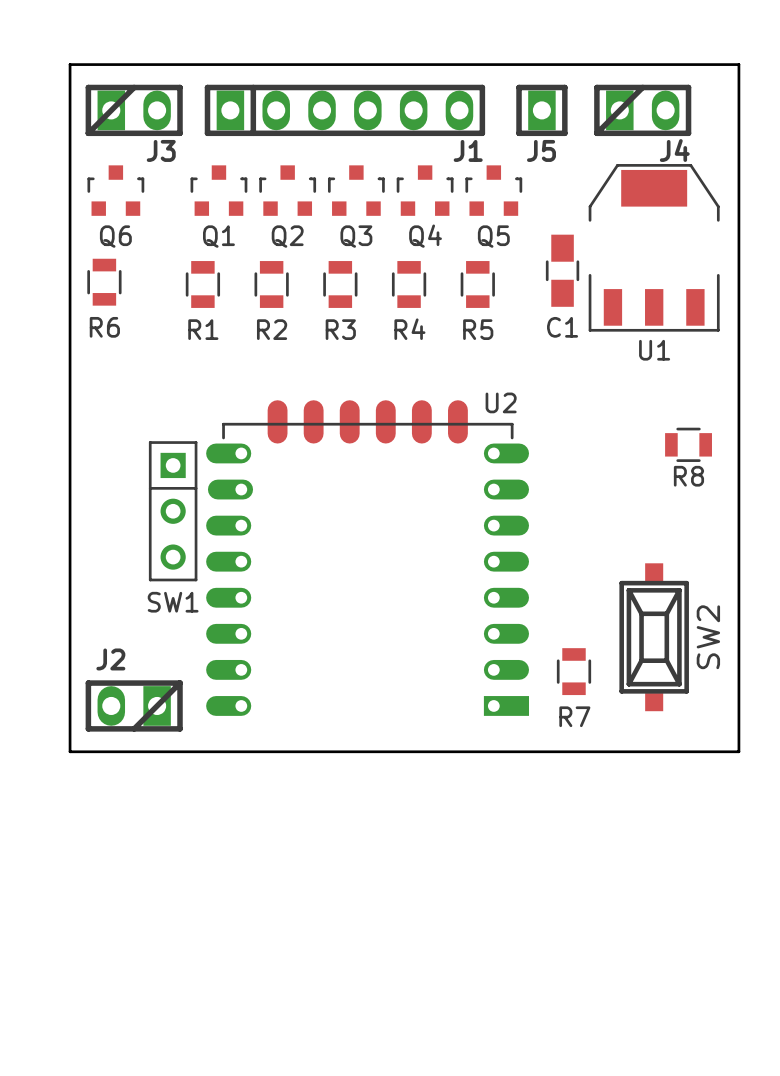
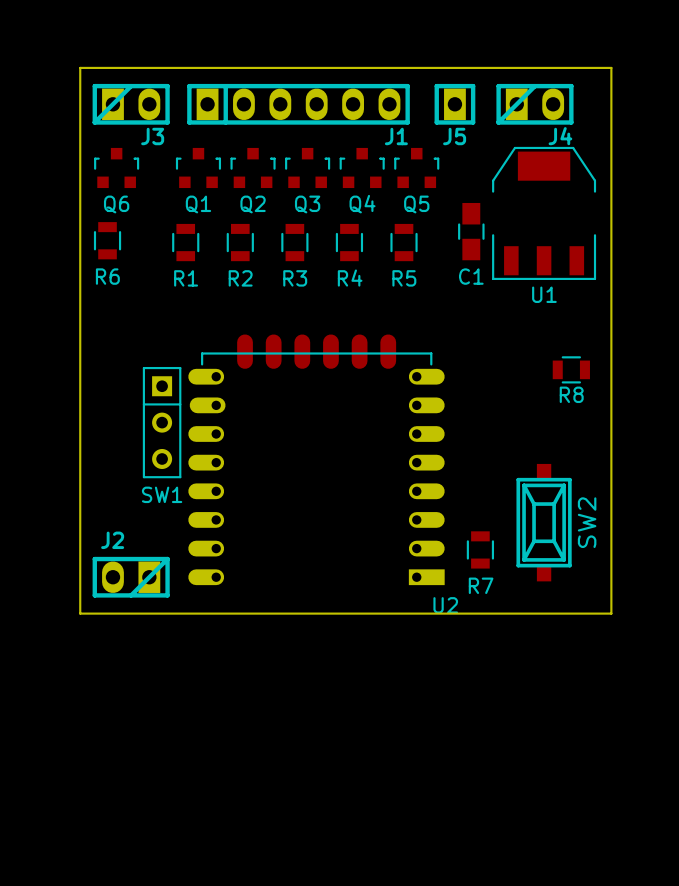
U2 name position: U2 (501, 402) -> U2 (445, 605)

